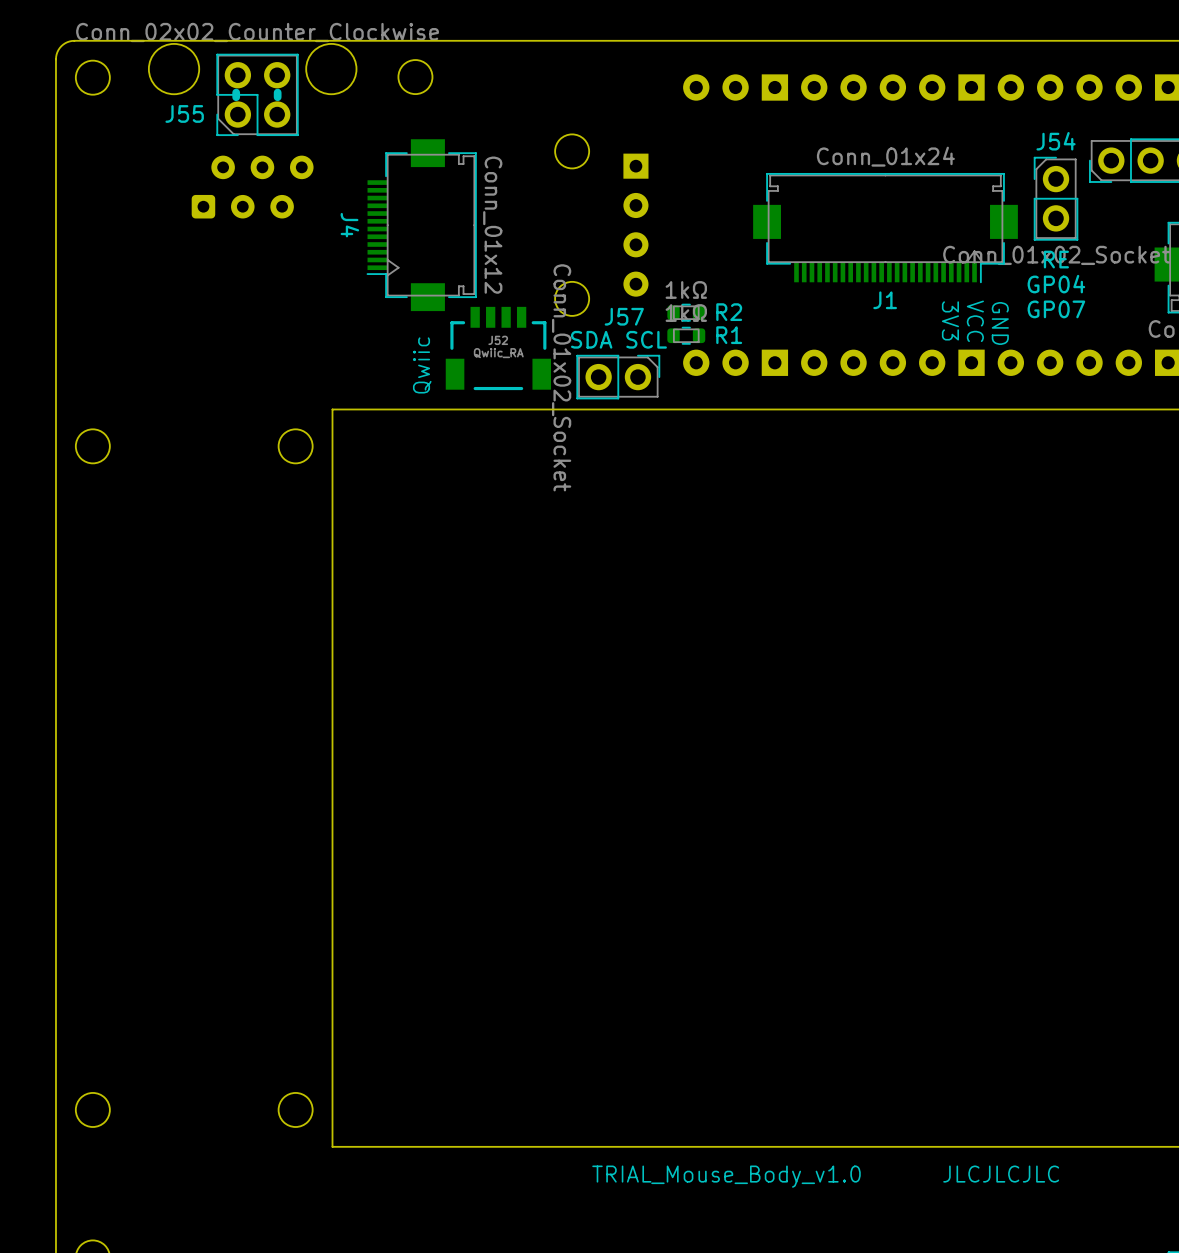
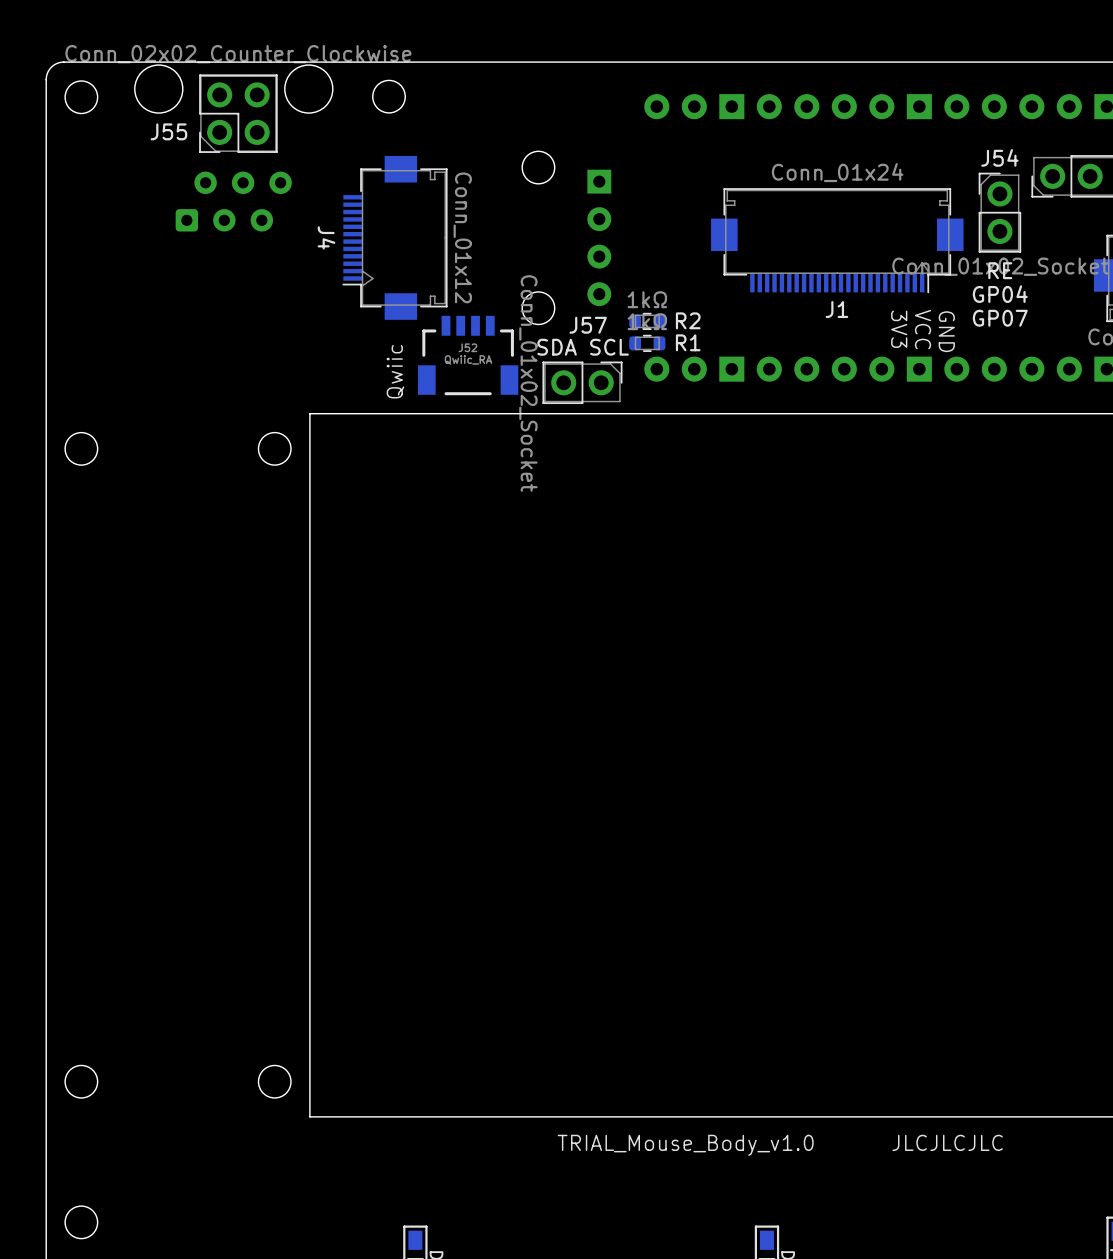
line: (236, 92) (236, 97) -> none
line: (277, 92) (277, 97) -> none

